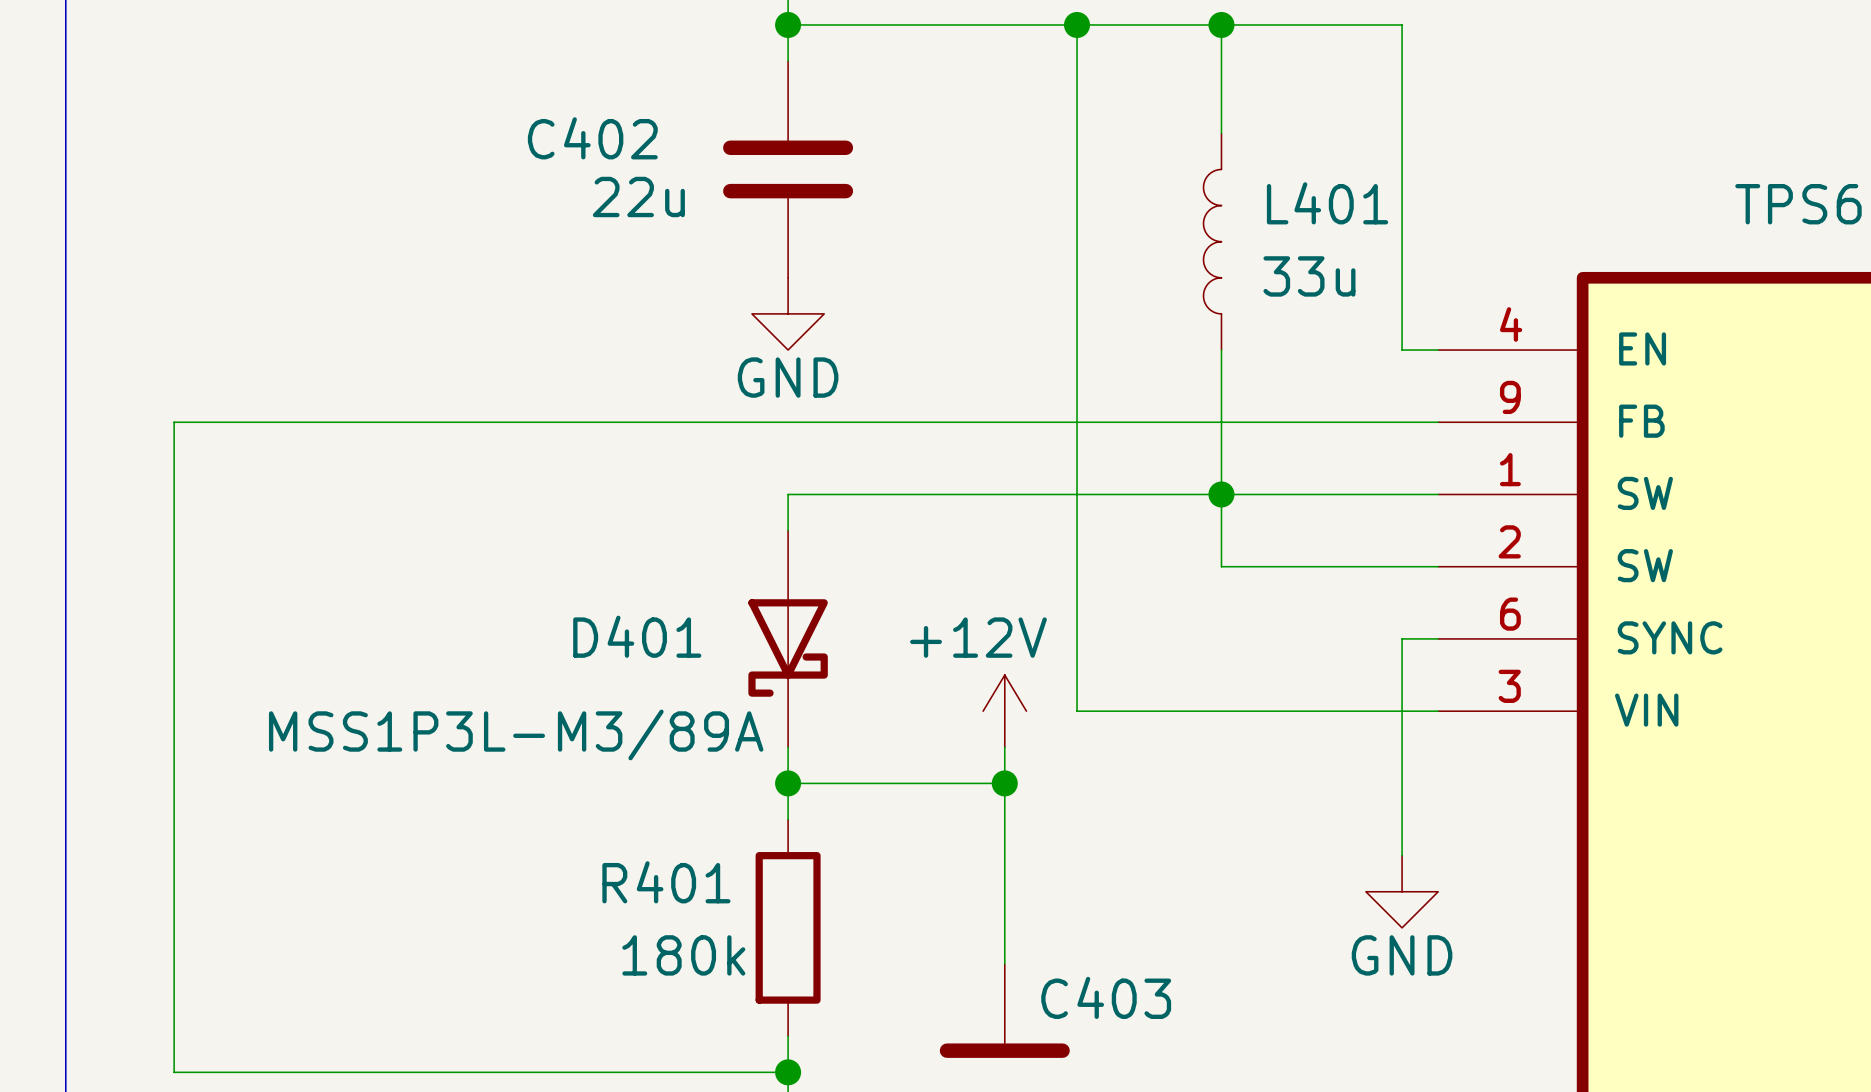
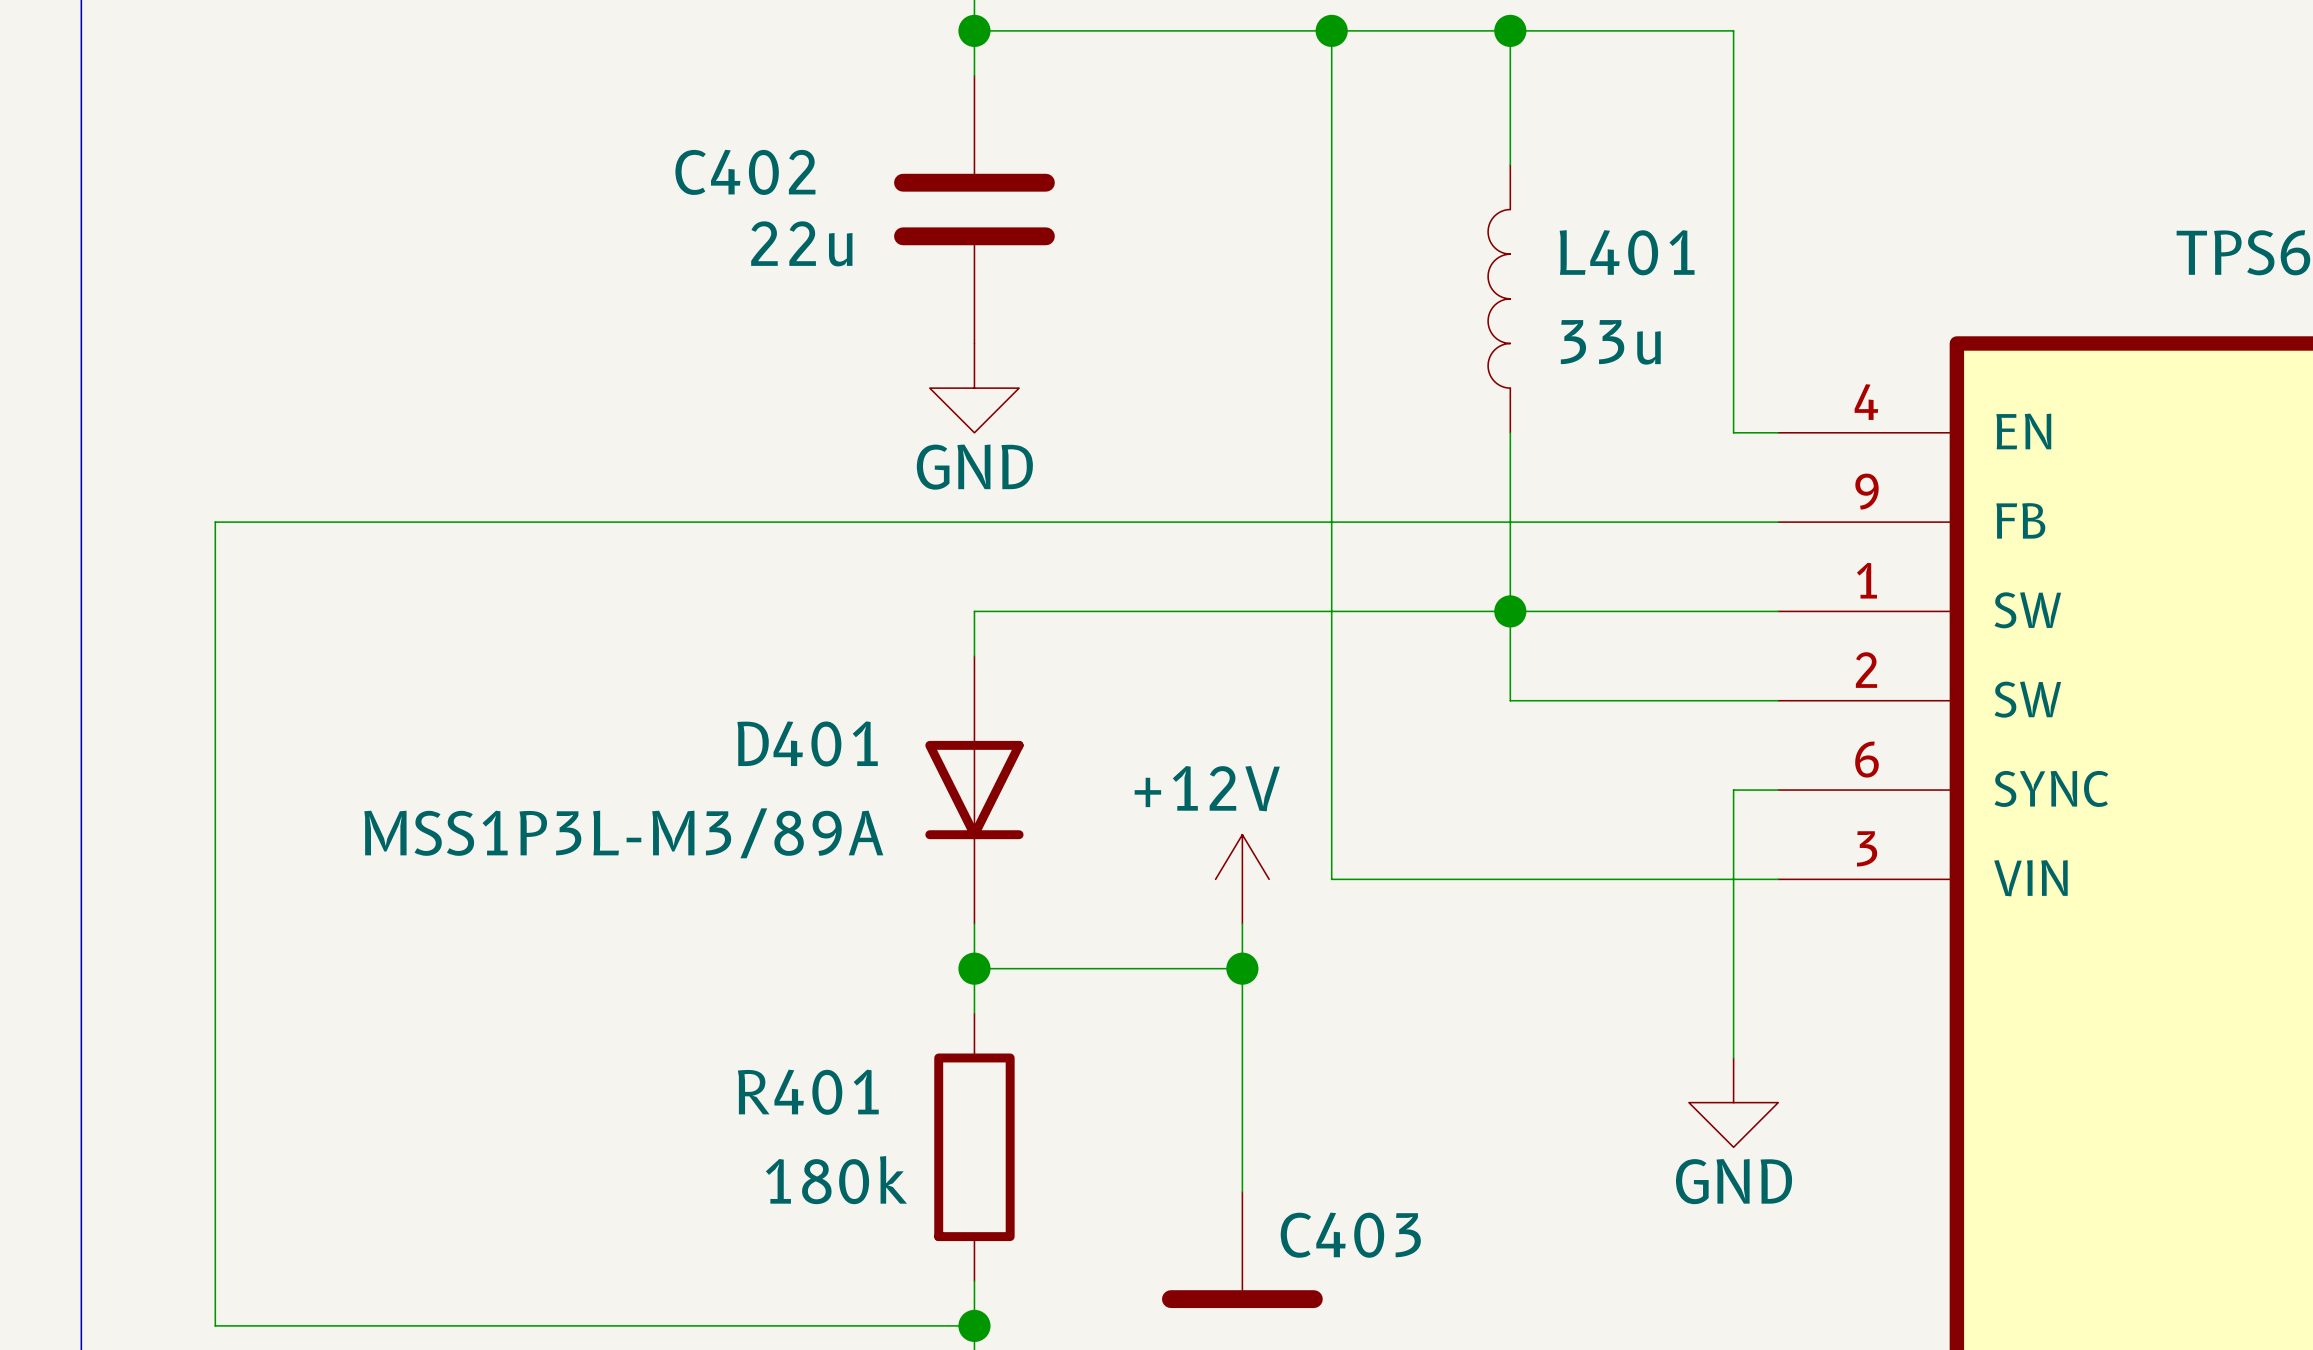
D401 symbol: [748, 530, 828, 748] -> [925, 656, 1024, 925]
D401 name position: D401 (637, 636) -> D401 (807, 743)
D401 value position: MSS1P3L-M3/89A (516, 734) -> MSS1P3L-M3/89A (623, 833)

